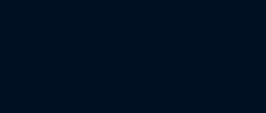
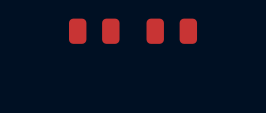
part: none -> (94, 31)
part: none -> (171, 31)

